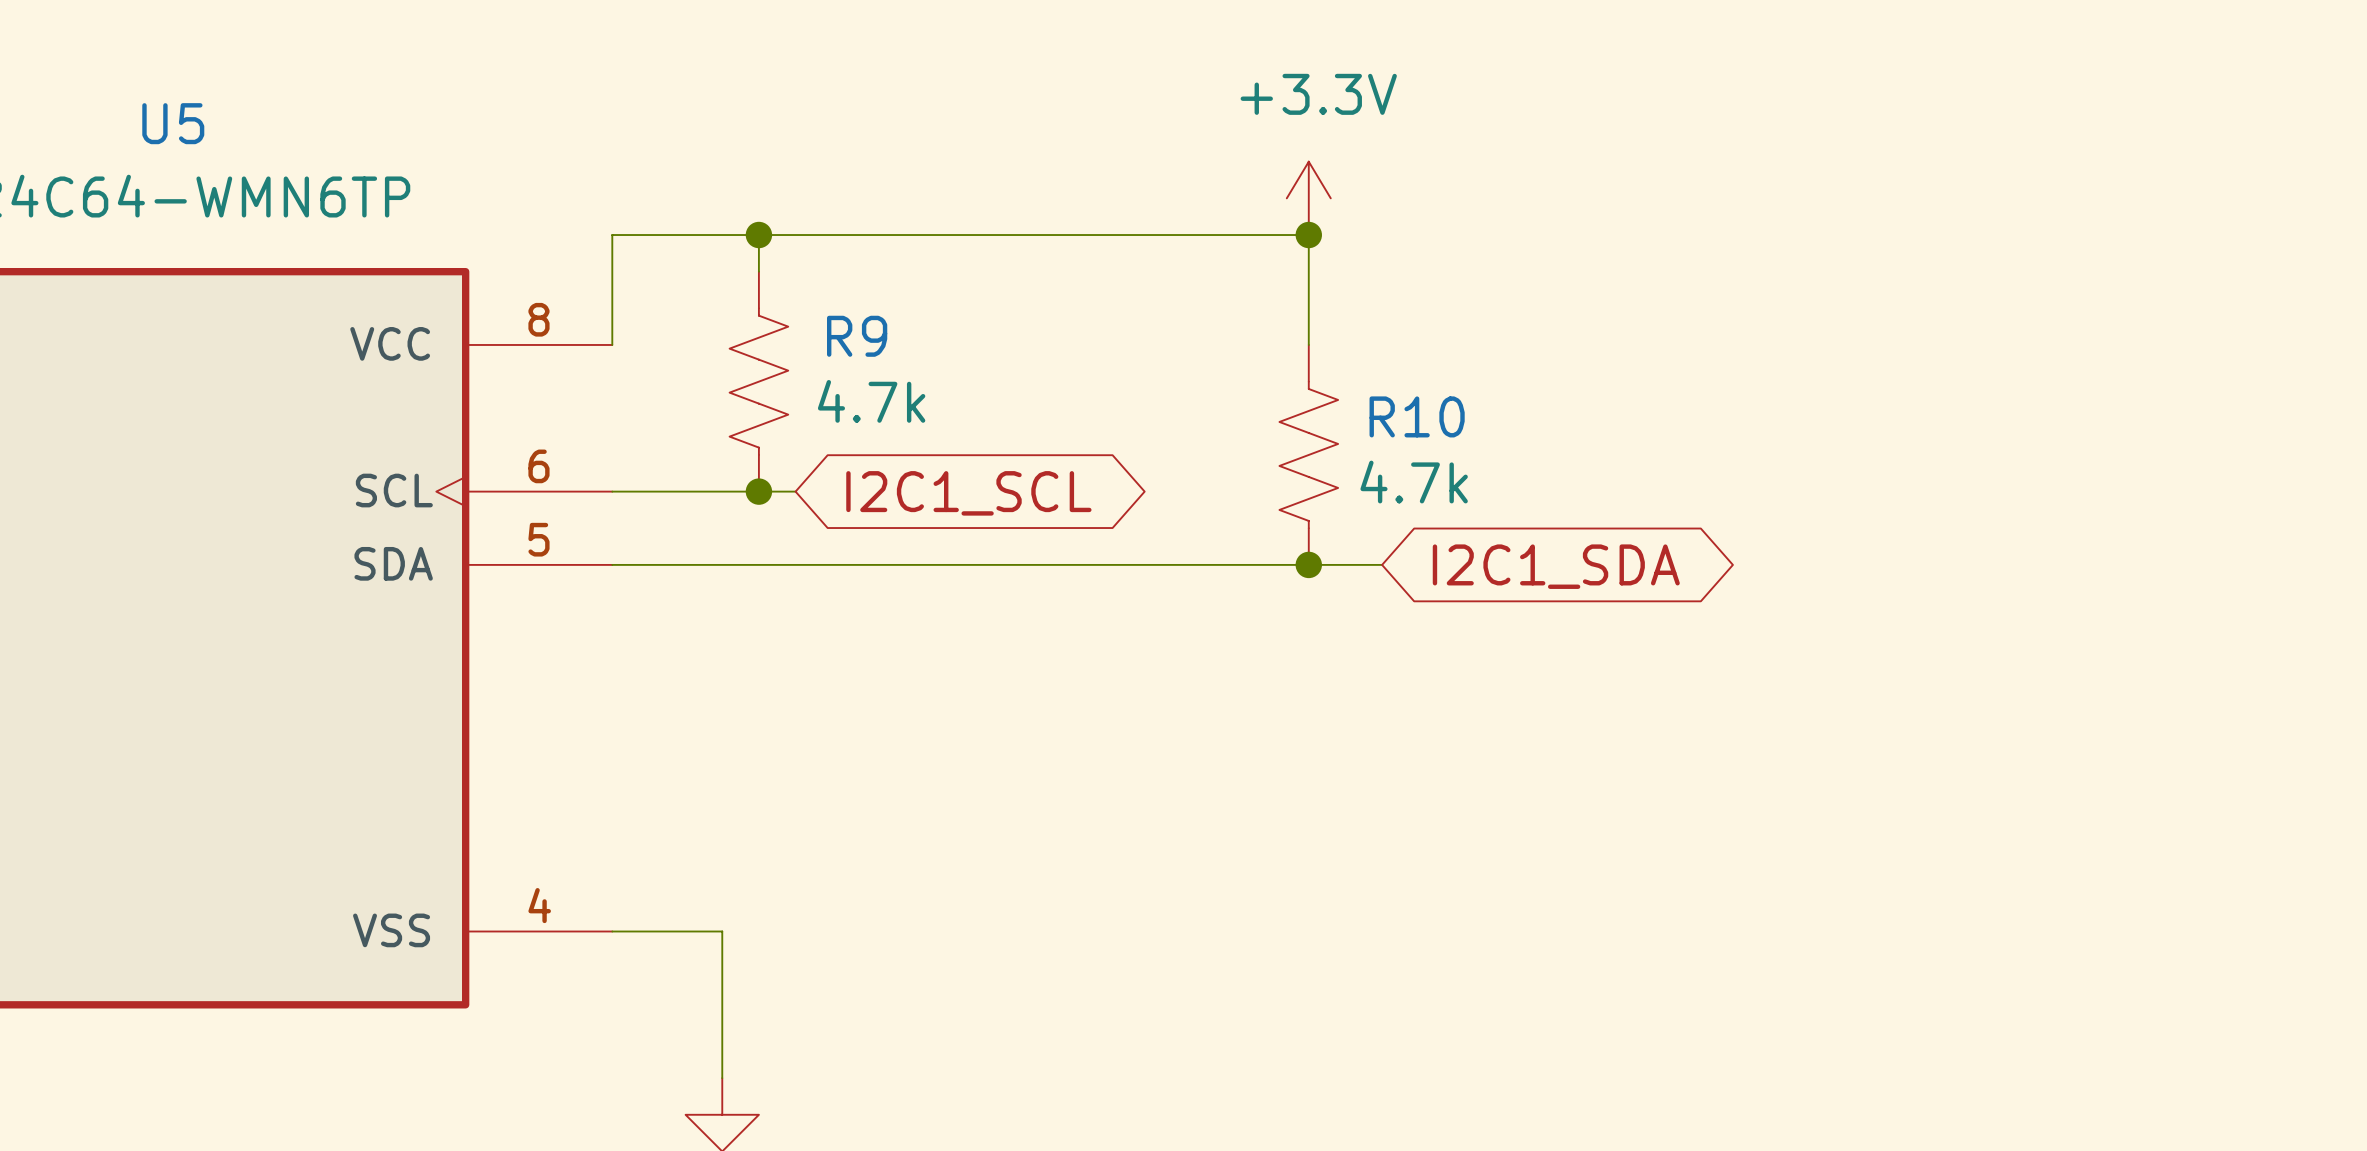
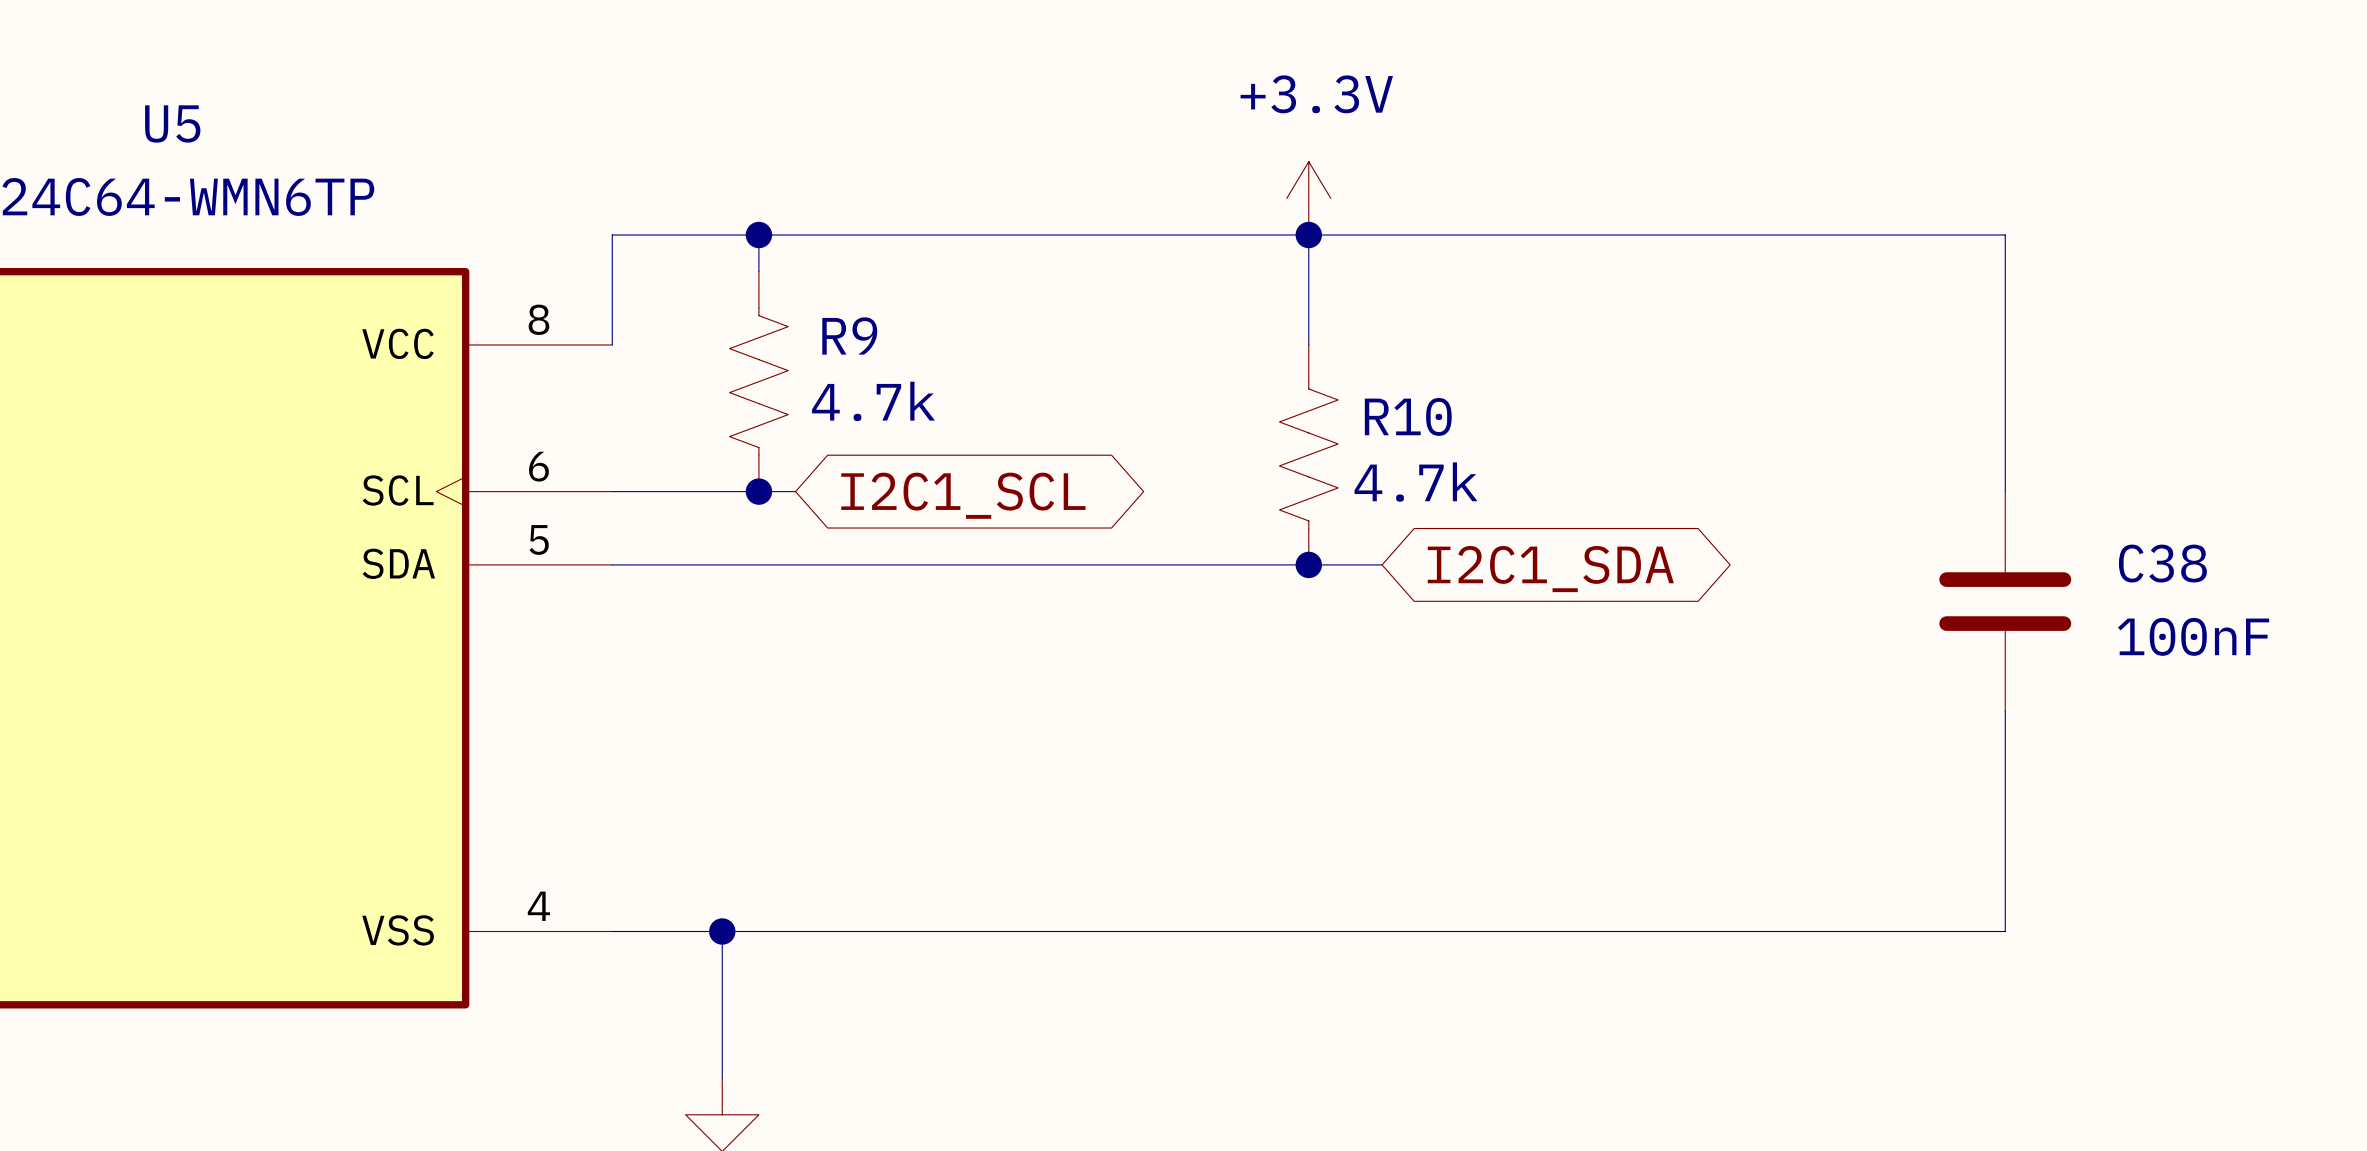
wire: none -> (1308, 235) (2005, 235) (2005, 491)
C38: none -> 100nF (2005, 601)
wire: none -> (2005, 711) (2005, 931) (722, 931)
junction: none -> (722, 931)

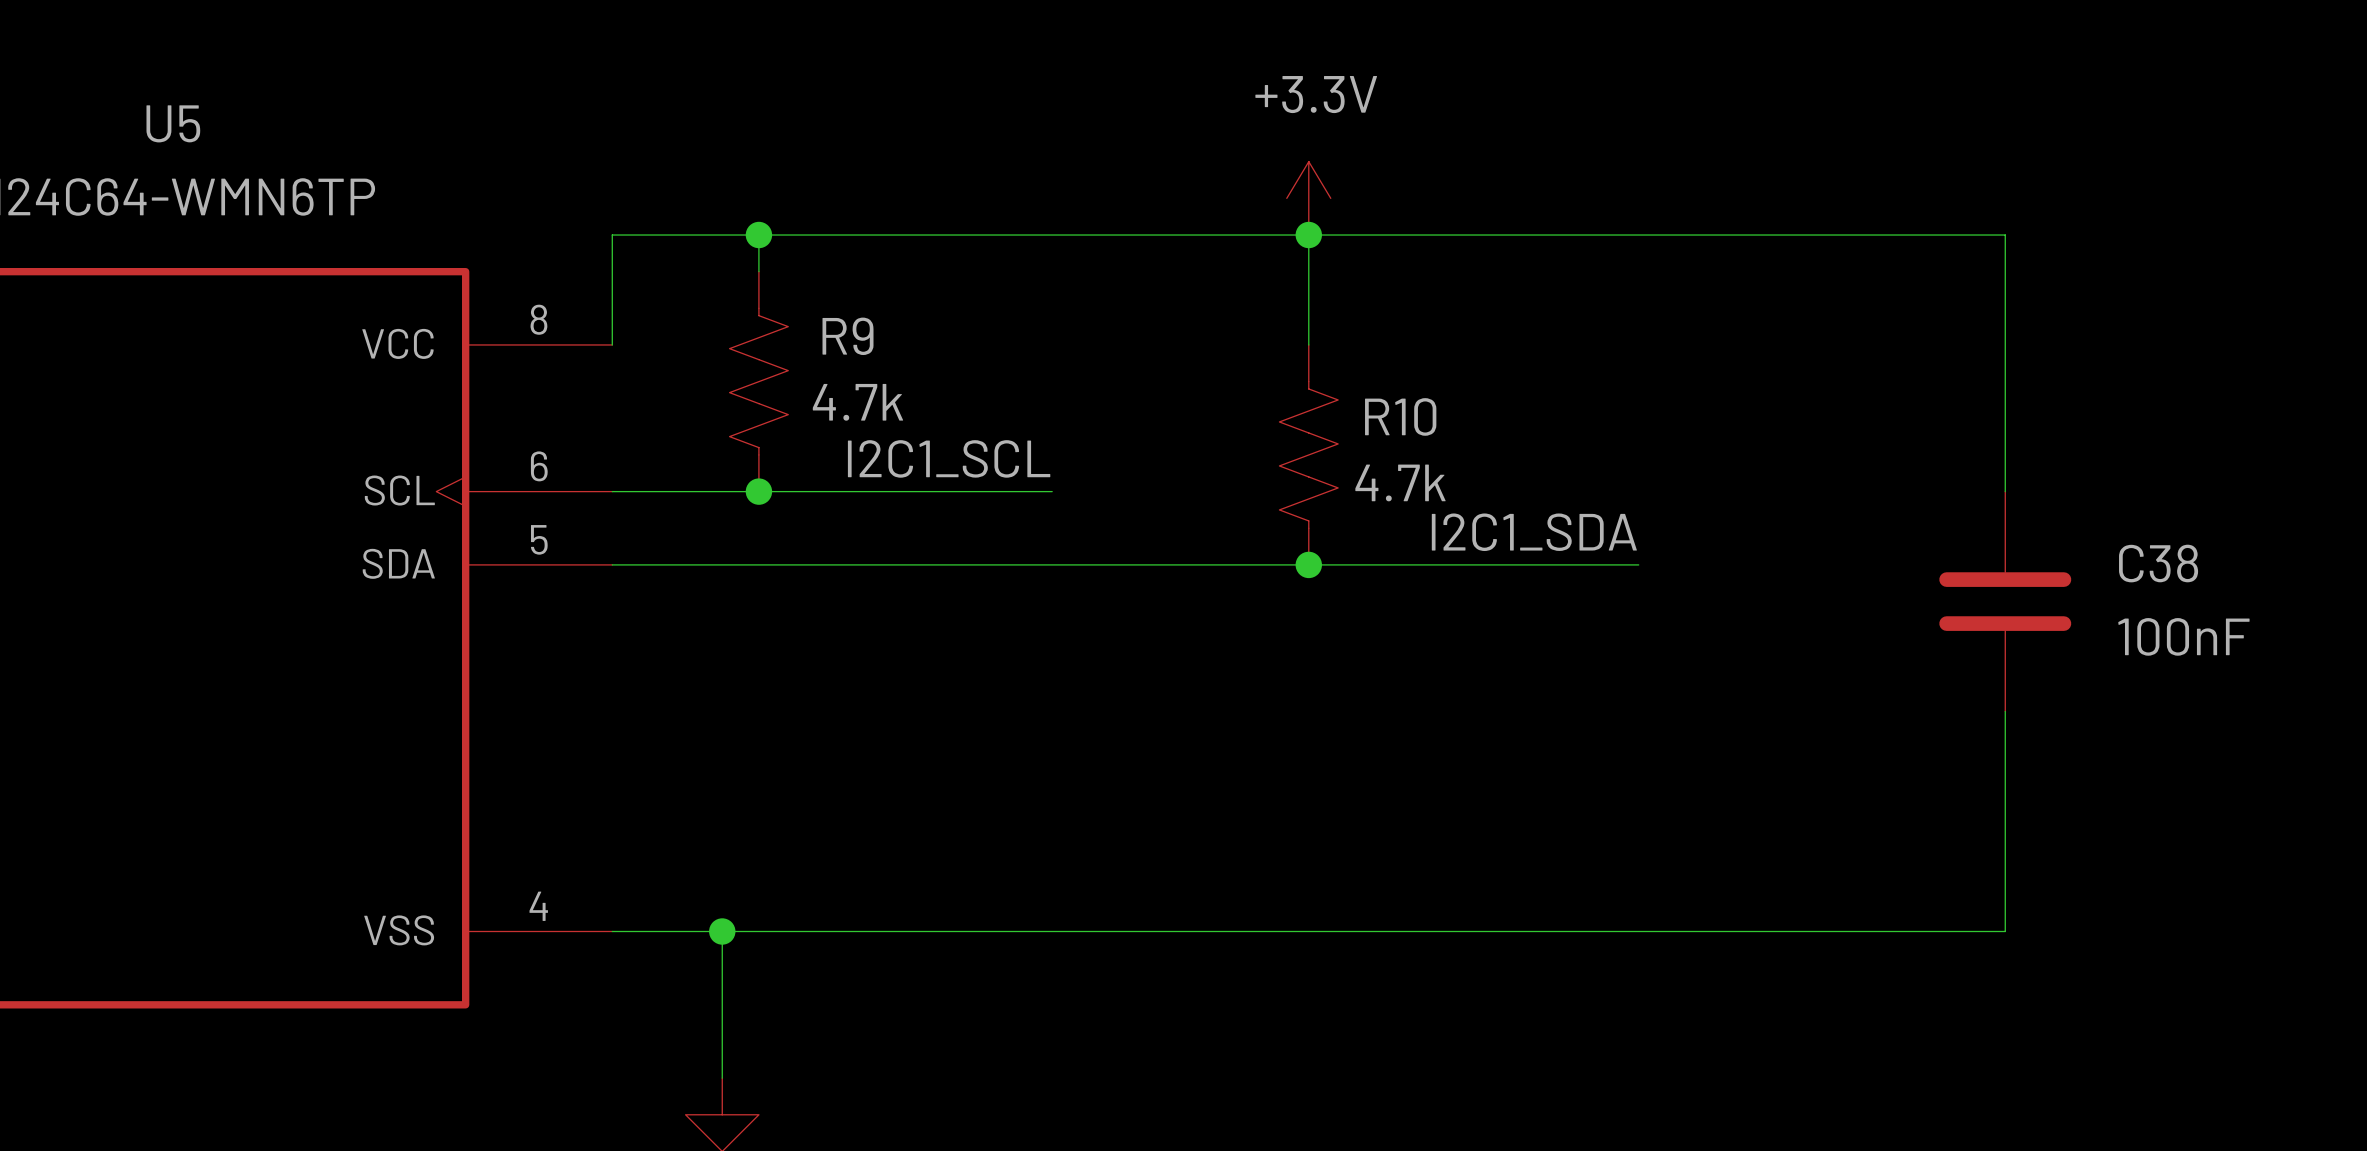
label: none -> I2C1_SCL (949, 458)
wire: none -> (795, 491) (1052, 491)
global label: I2C1_SCL (963, 495) -> none
label: none -> I2C1_SDA (1534, 532)
wire: none -> (1382, 564) (1638, 564)
global label: I2C1_SDA (1550, 569) -> none

